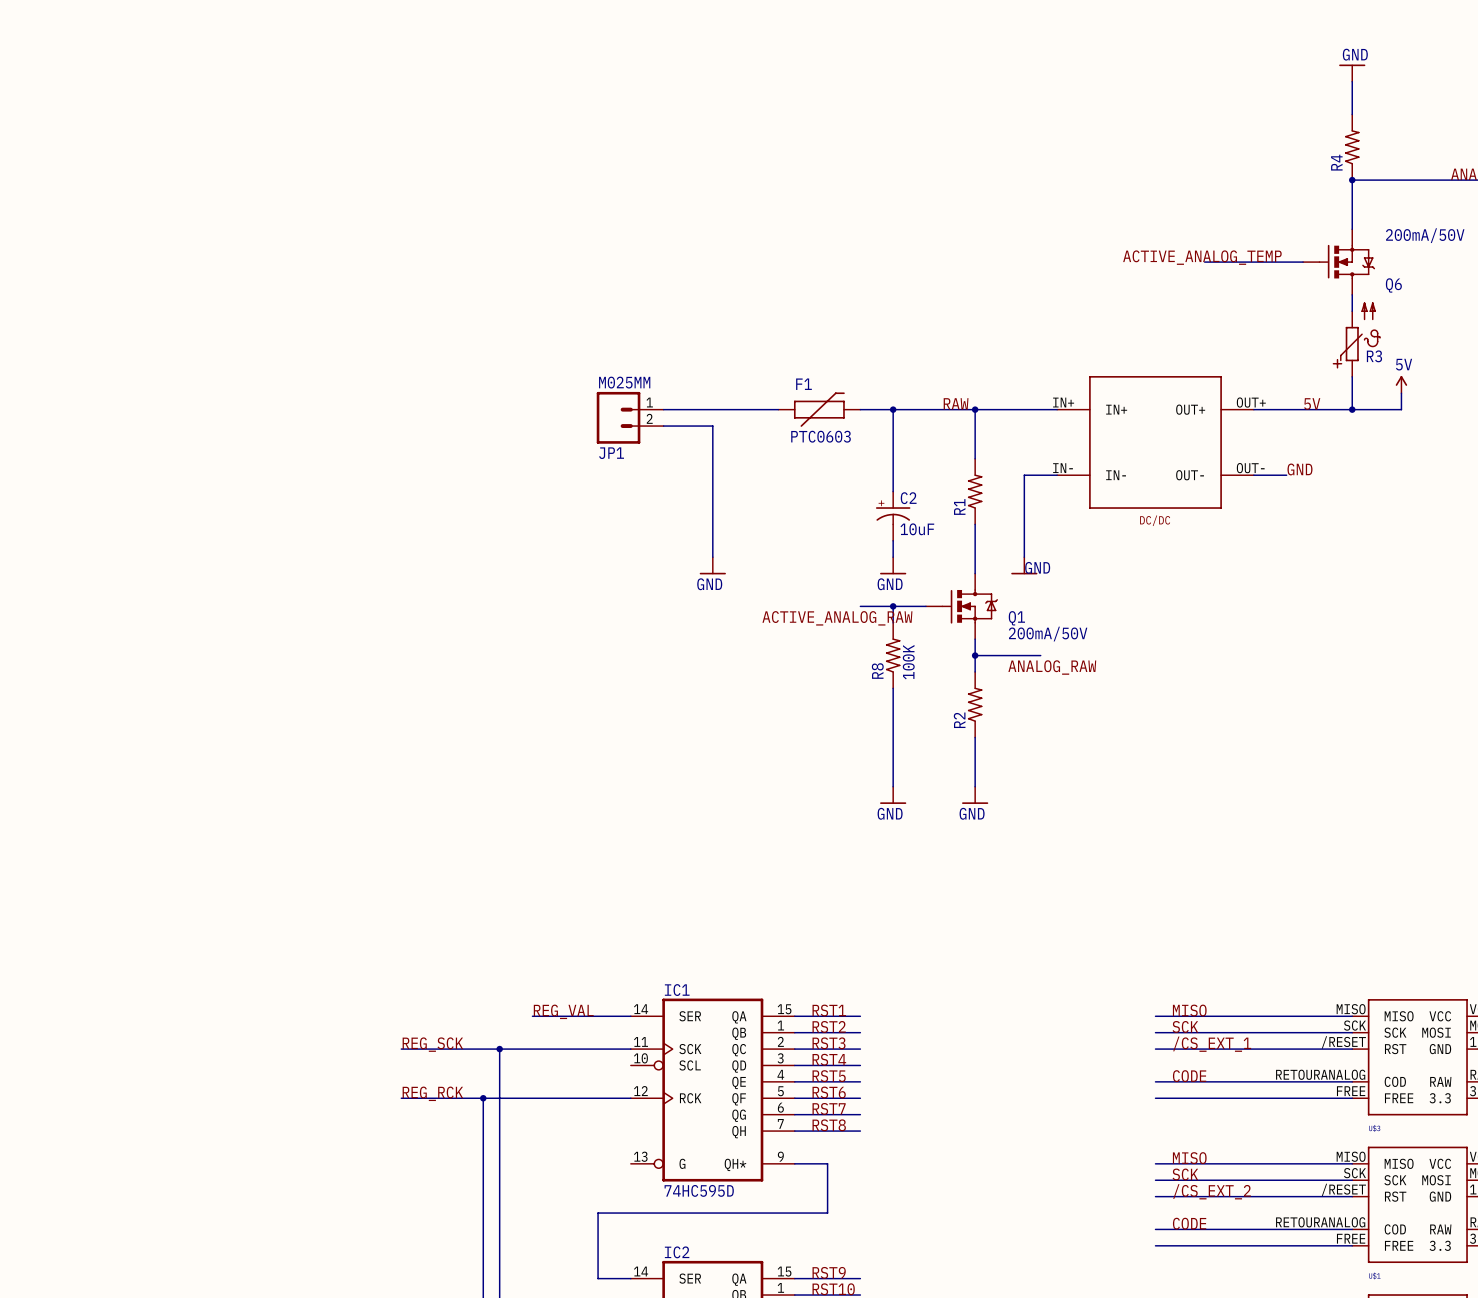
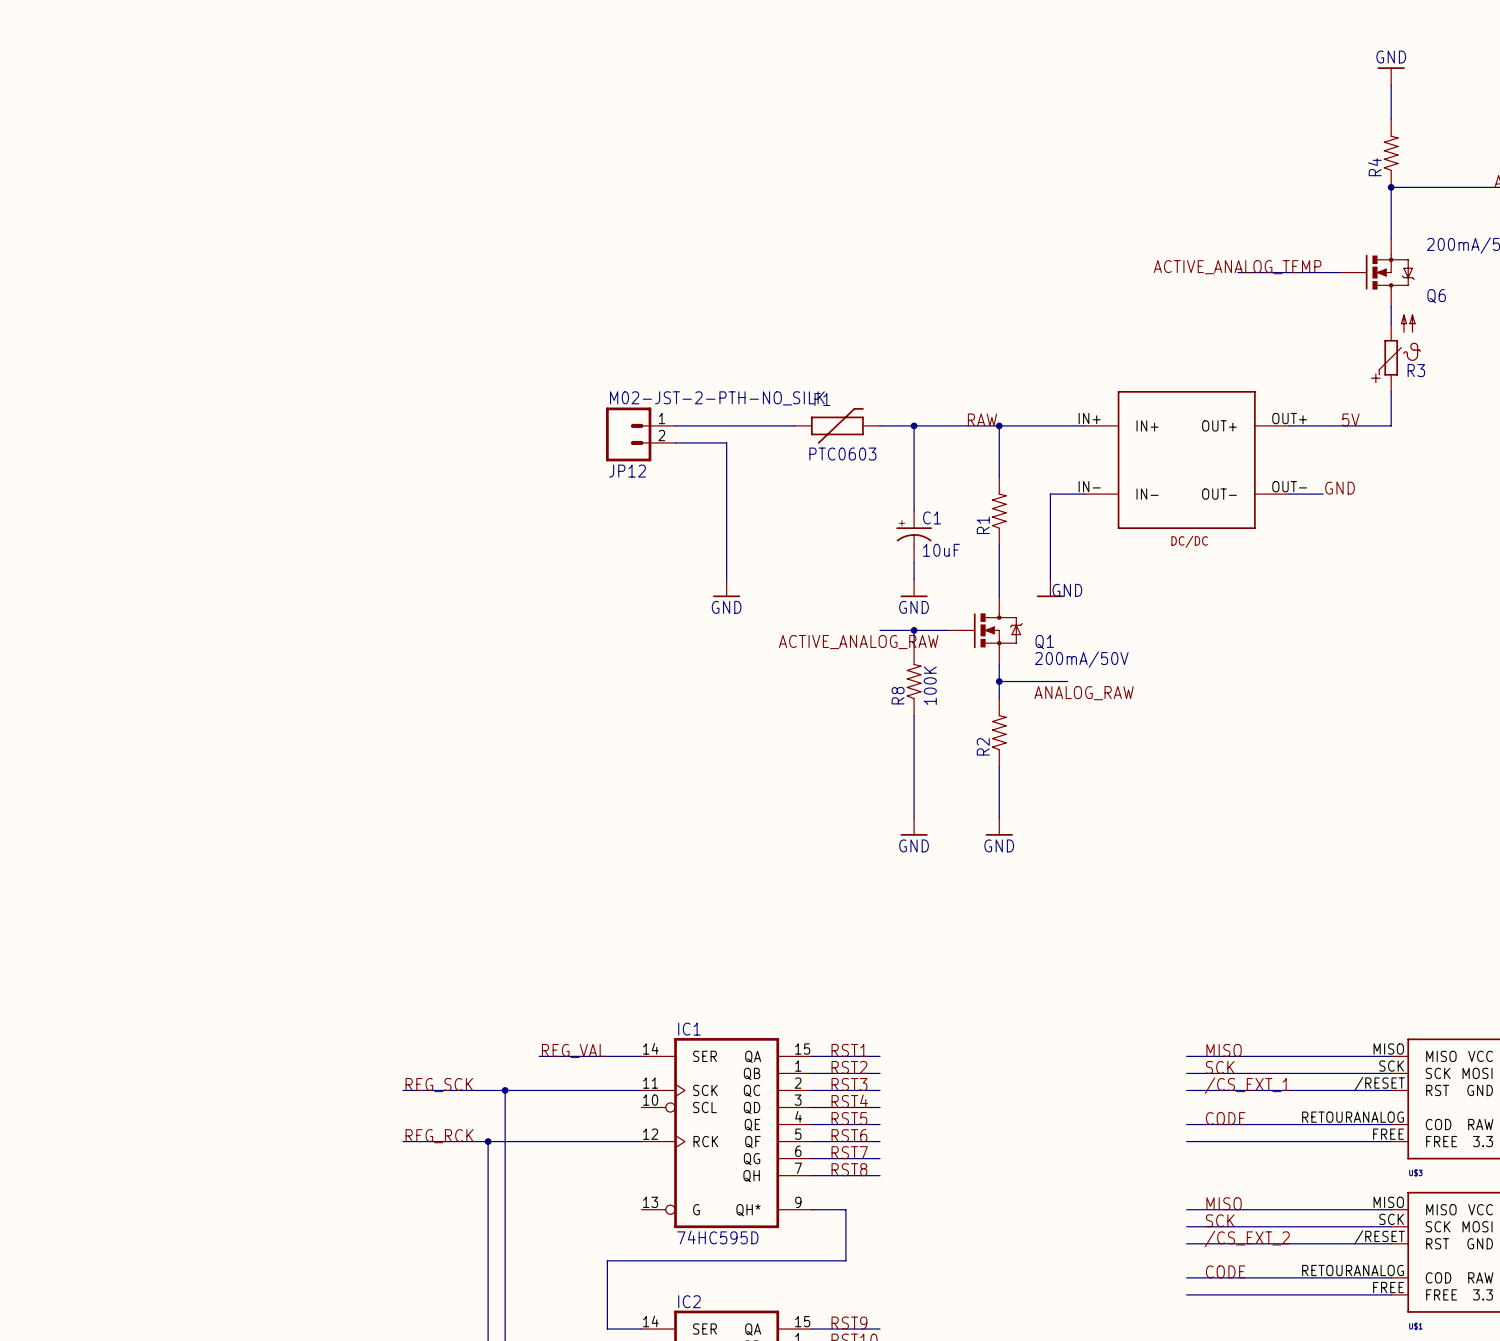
JP1 value: M025MM (624, 382) -> M02-JST-2-PTH-NO_SILK (717, 398)
power symbol: 5V (1401, 384) -> none
wire: (1401, 393) (1401, 409) (1352, 409) -> none
junction: (1352, 409) -> none
JP1 name: JP1 (611, 453) -> JP12 (627, 471)
C2 name: C2 (908, 498) -> C1 (932, 517)

